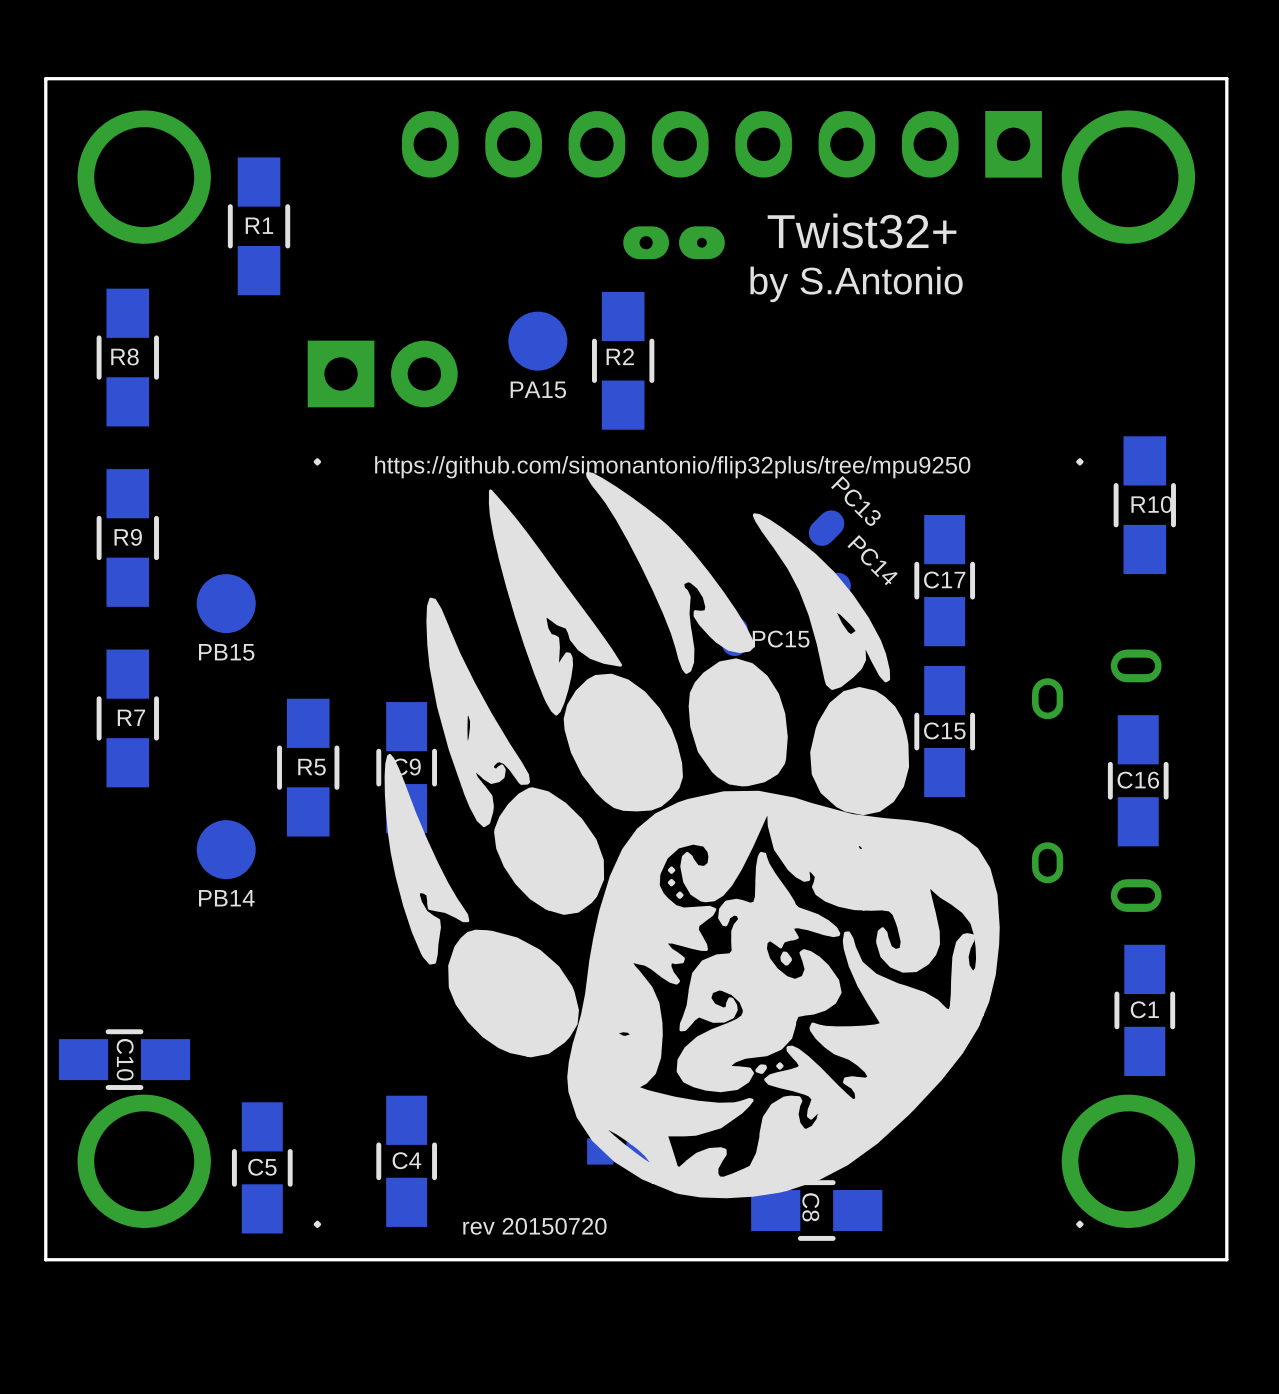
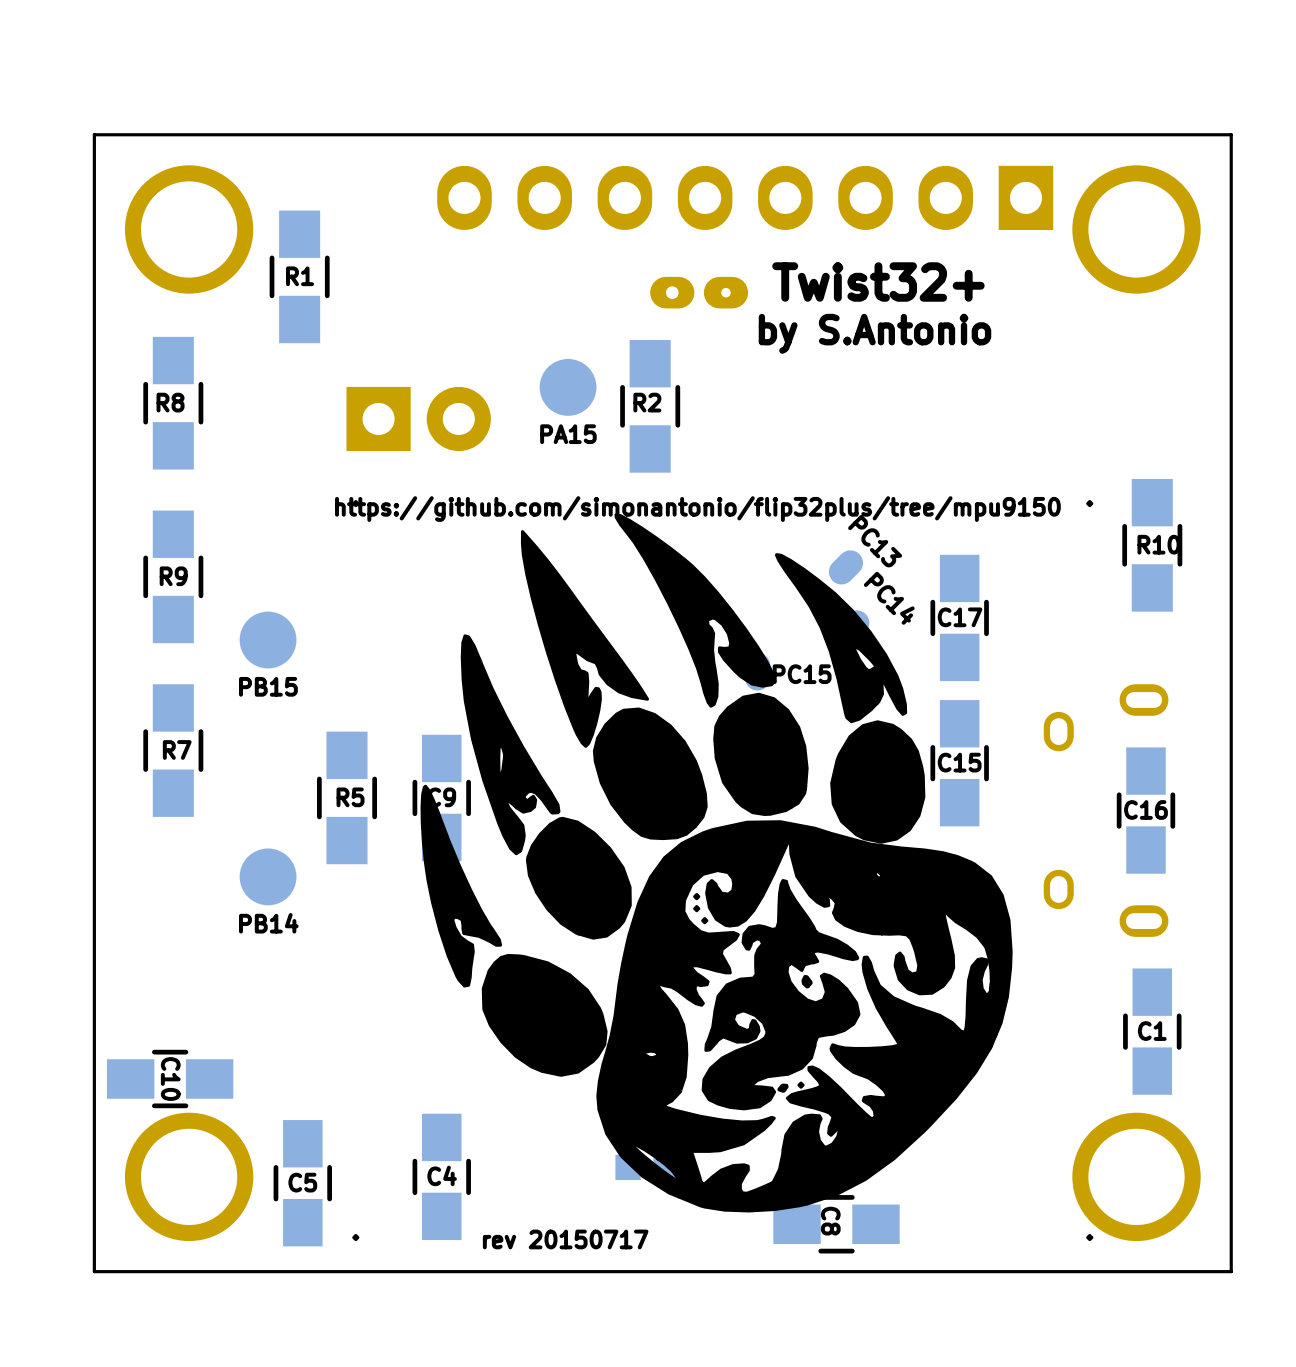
text: https://github.com/simonantonio/flip32plus/tree/mpu9250 (672, 467) -> https://github.com/simonantonio/flip32plus/tree/mpu9150 (697, 509)
text: rev 20150720 (534, 1226) -> rev 20150717 (565, 1239)

